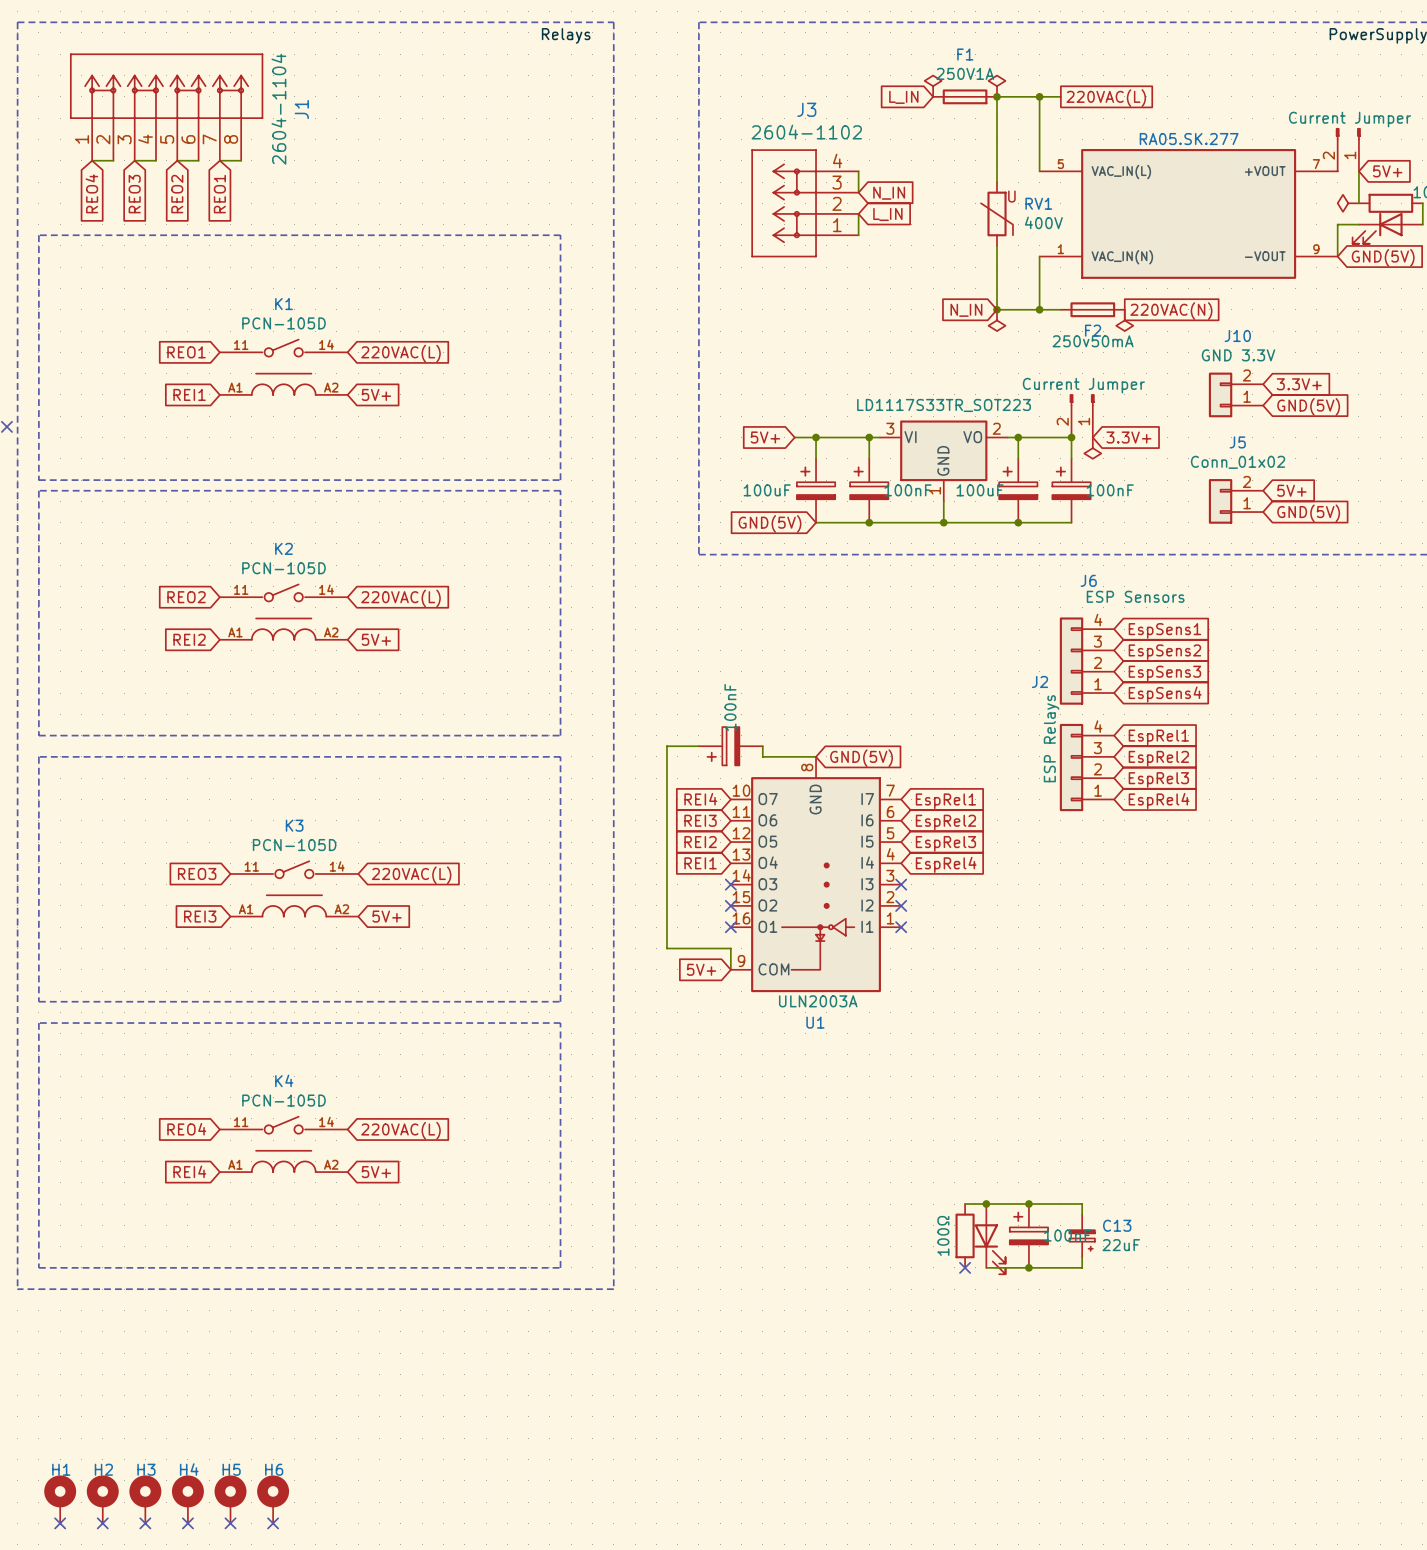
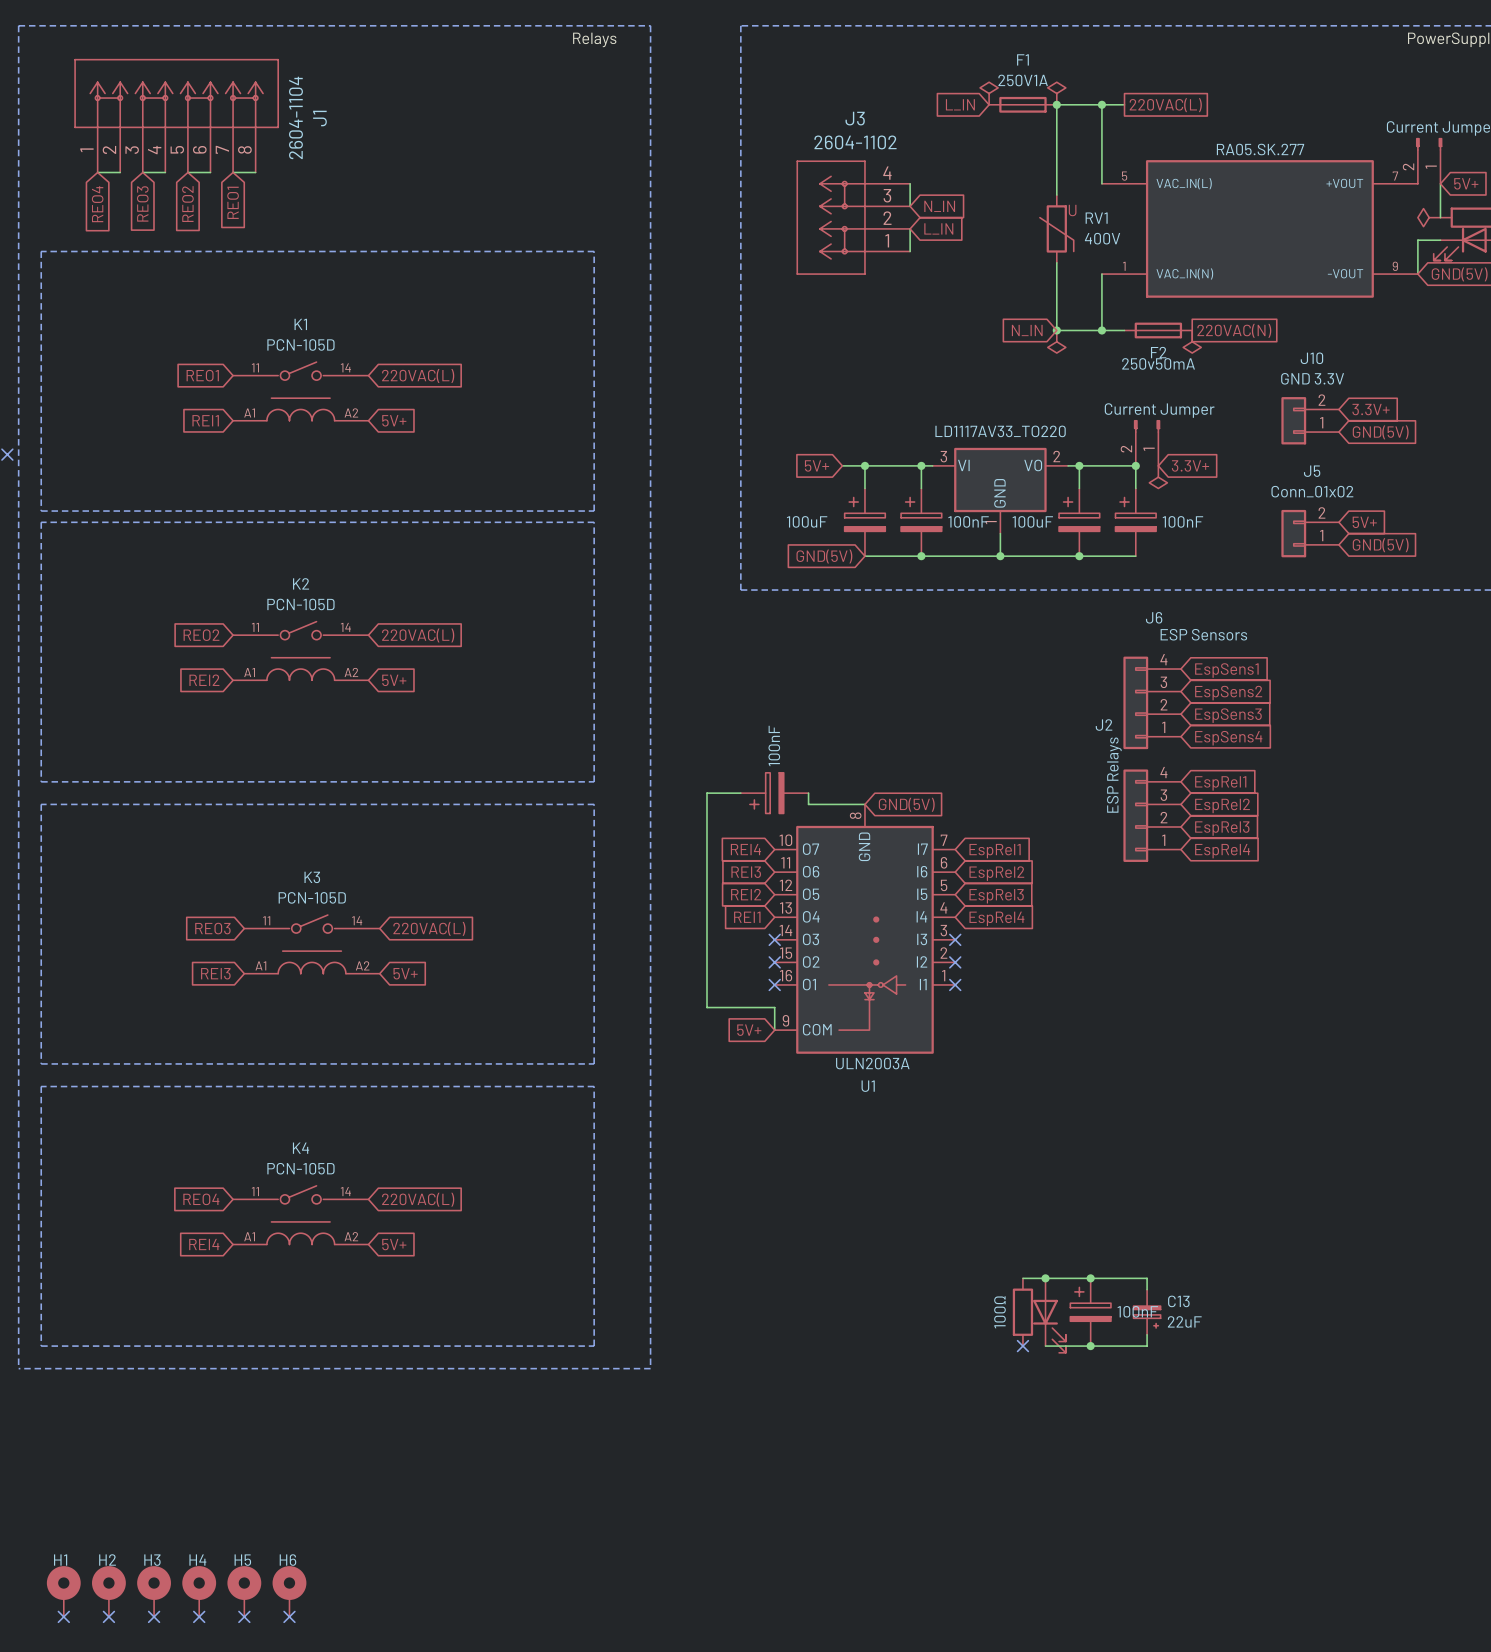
part value: LD1117S33TR_SOT223 (944, 405) -> LD1117AV33_TO220 (1000, 431)

